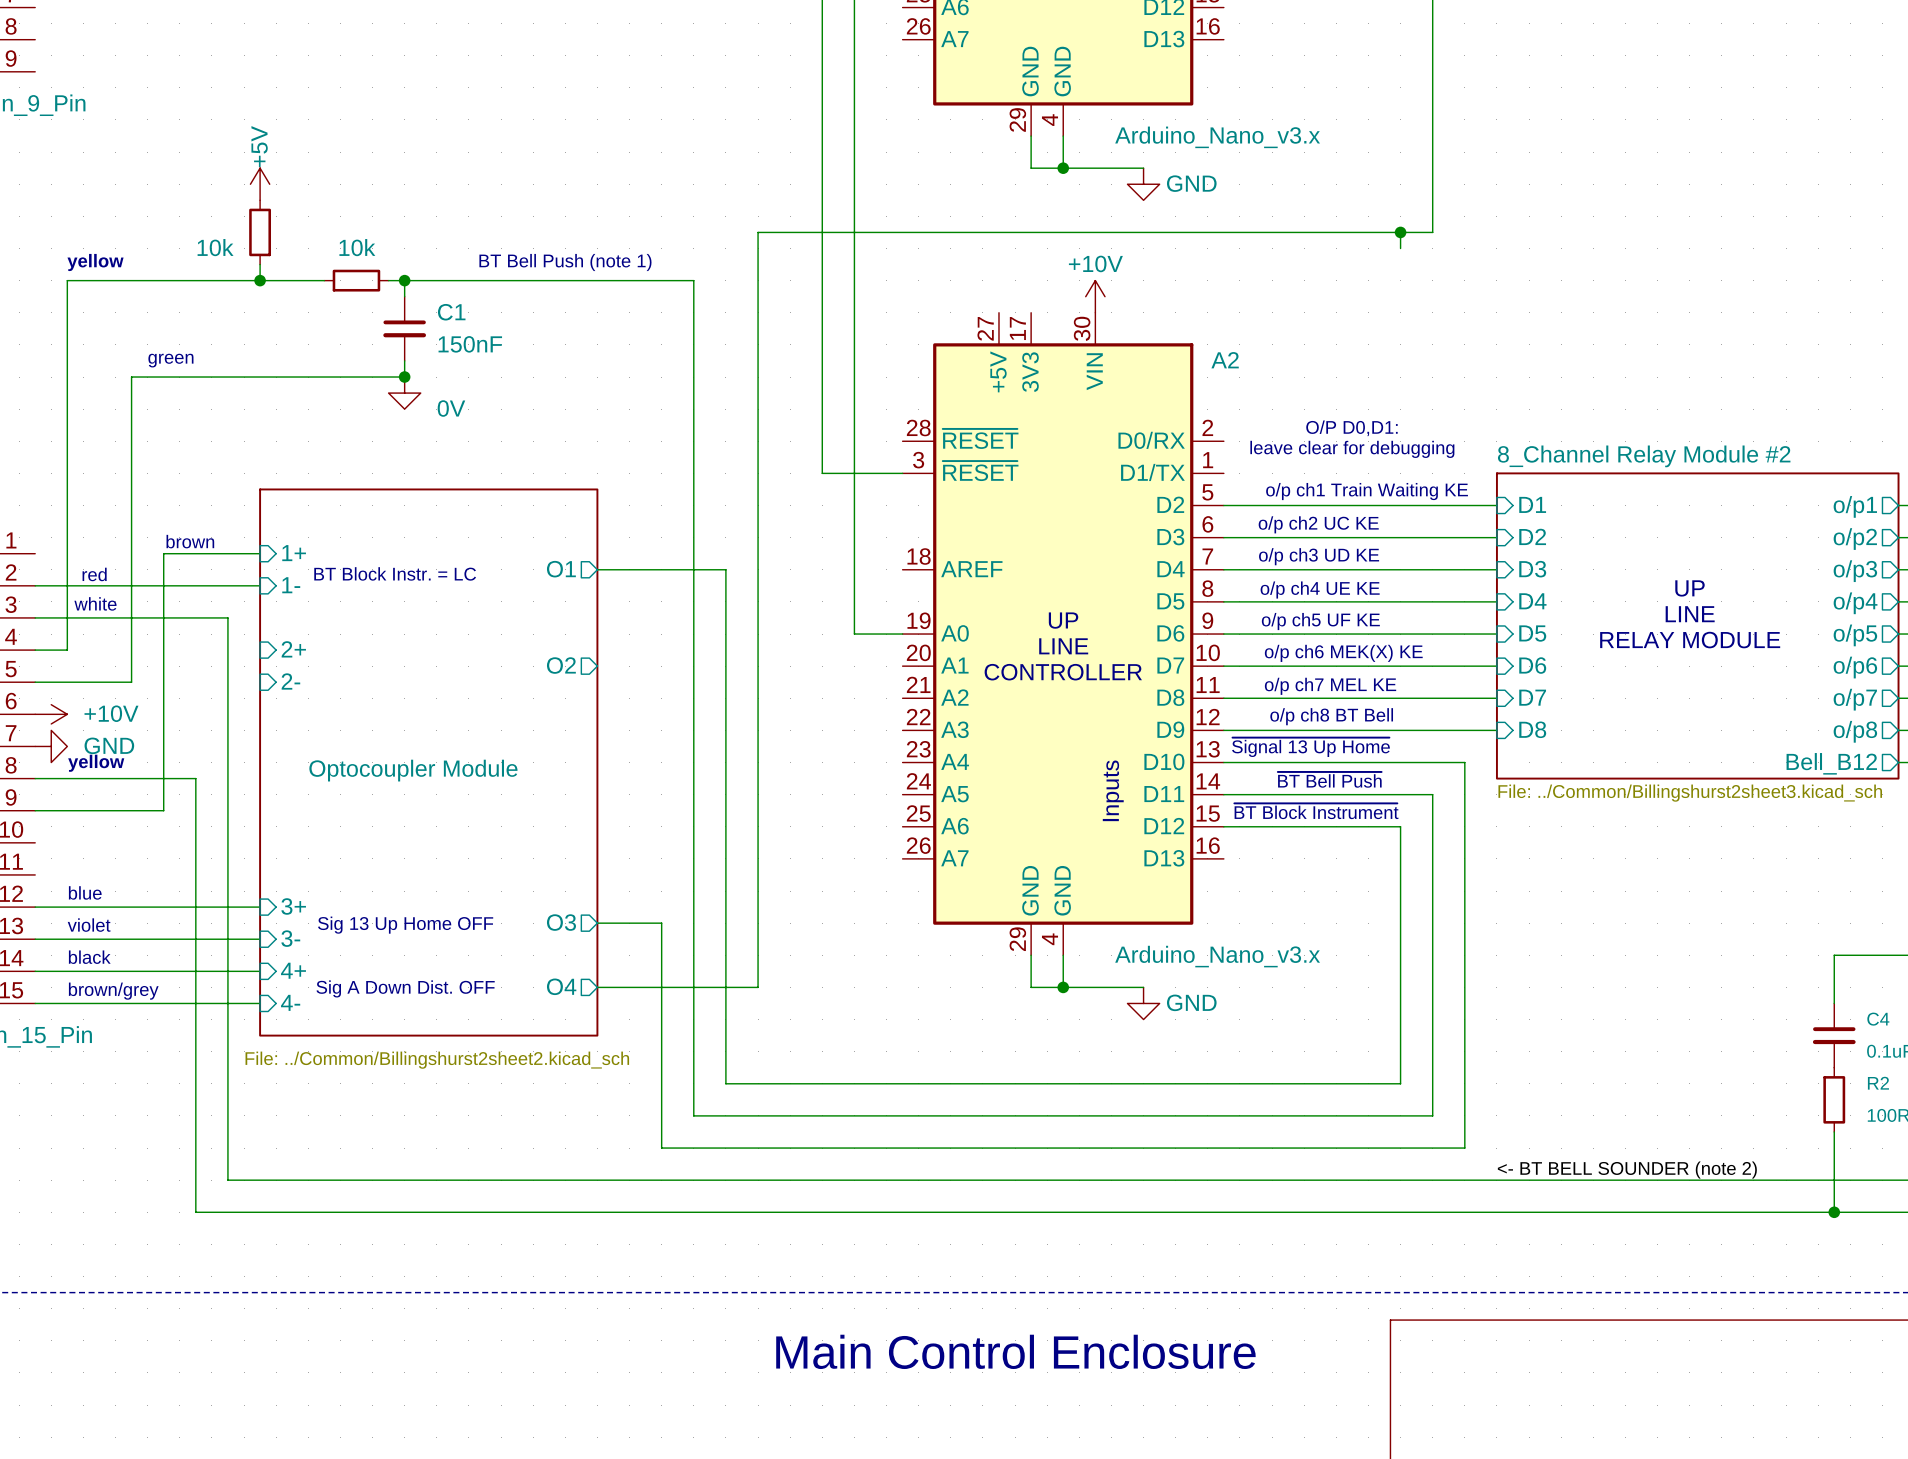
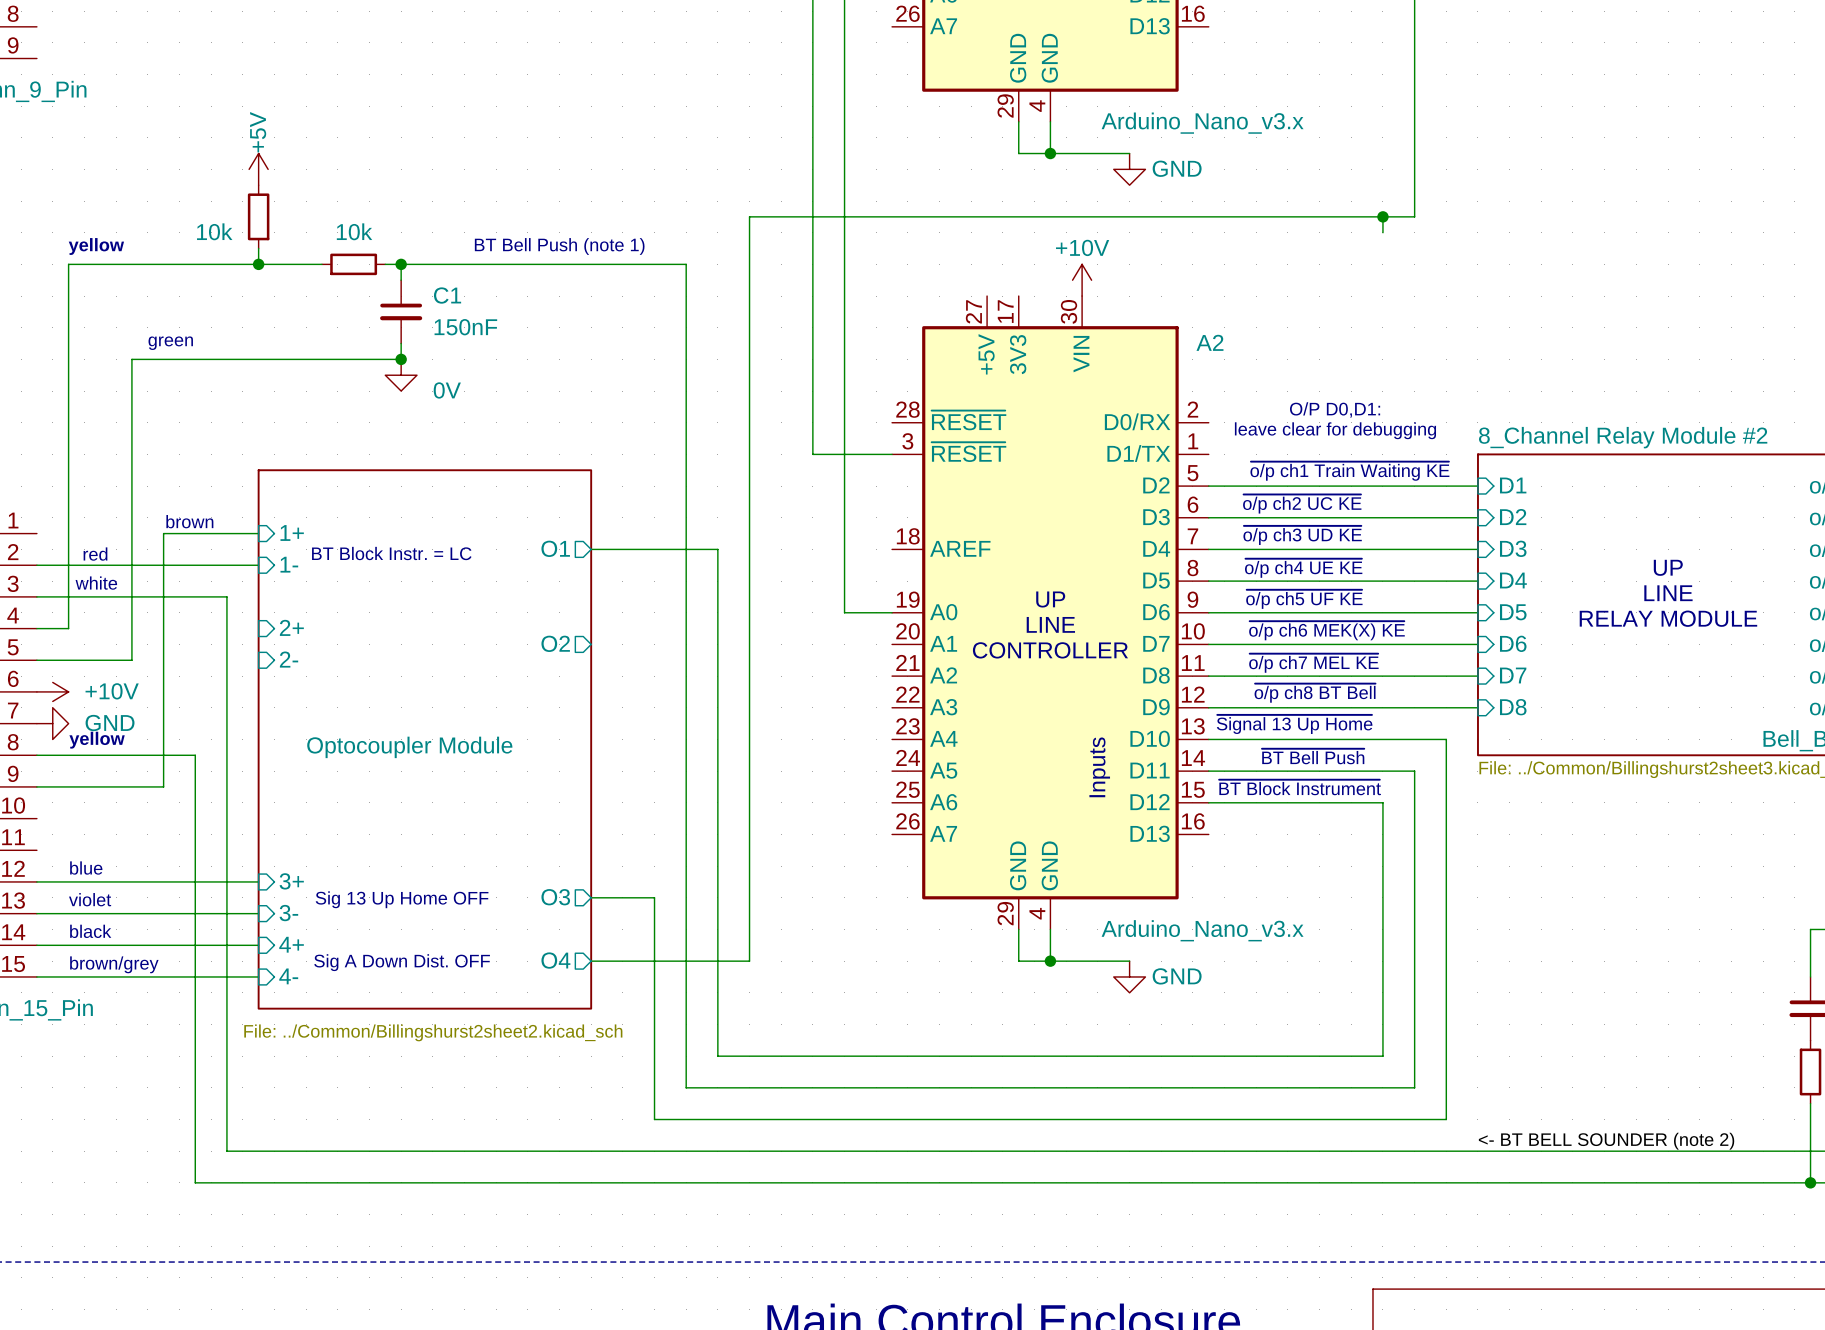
text: o/p ch1 Train Waiting KE (1367, 491) -> ~{o/p ch1 Train Waiting KE} (1349, 471)
text: o/p ch2 UC KE (1318, 524) -> ~{o/p ch2 UC KE} (1302, 504)
text: o/p ch3 UD KE (1319, 556) -> ~{o/p ch3 UD KE} (1302, 535)
text: o/p ch4 UE KE (1320, 590) -> ~{o/p ch4 UE KE} (1303, 568)
text: o/p ch5 UF KE (1320, 621) -> ~{o/p ch5 UF KE} (1304, 599)
text: o/p ch6 MEK(X) KE (1343, 653) -> ~{o/p ch6 MEK(X) KE} (1326, 630)
text: o/p ch7 MEL KE (1330, 686) -> ~{o/p ch7 MEL KE} (1313, 663)
text: o/p ch8 BT Bell (1331, 716) -> ~{o/p ch8 BT Bell} (1315, 693)

